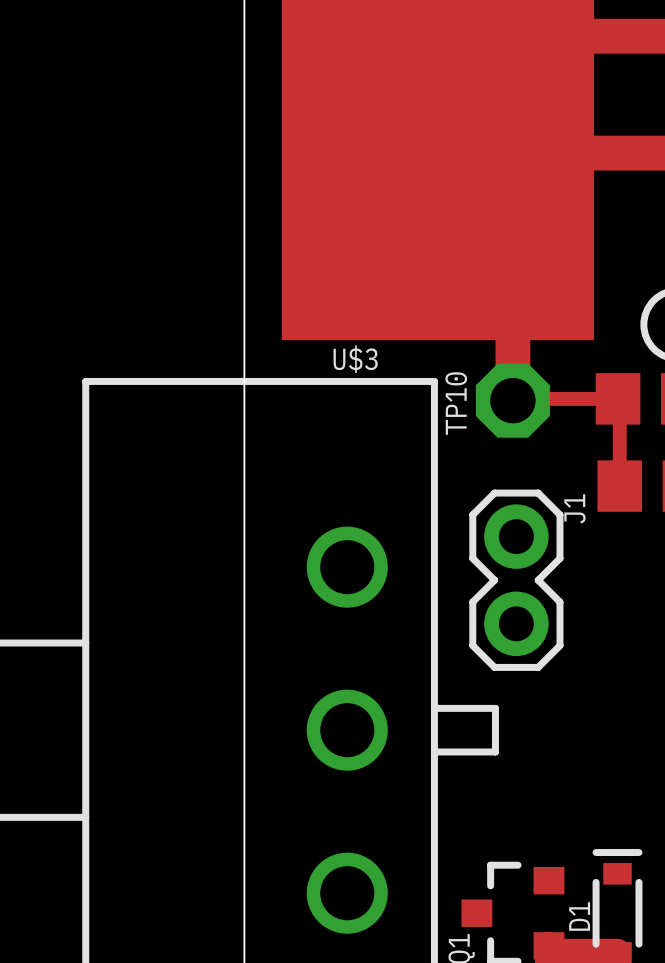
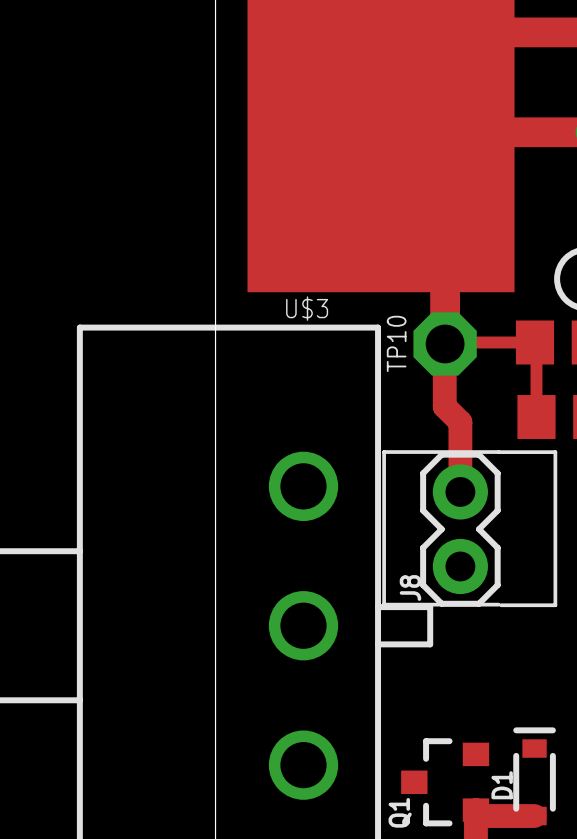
track: none -> (444, 344) (444, 406) (460, 422) (460, 491)
J1: (516, 580) -> none
J8: none -> (469, 528)

